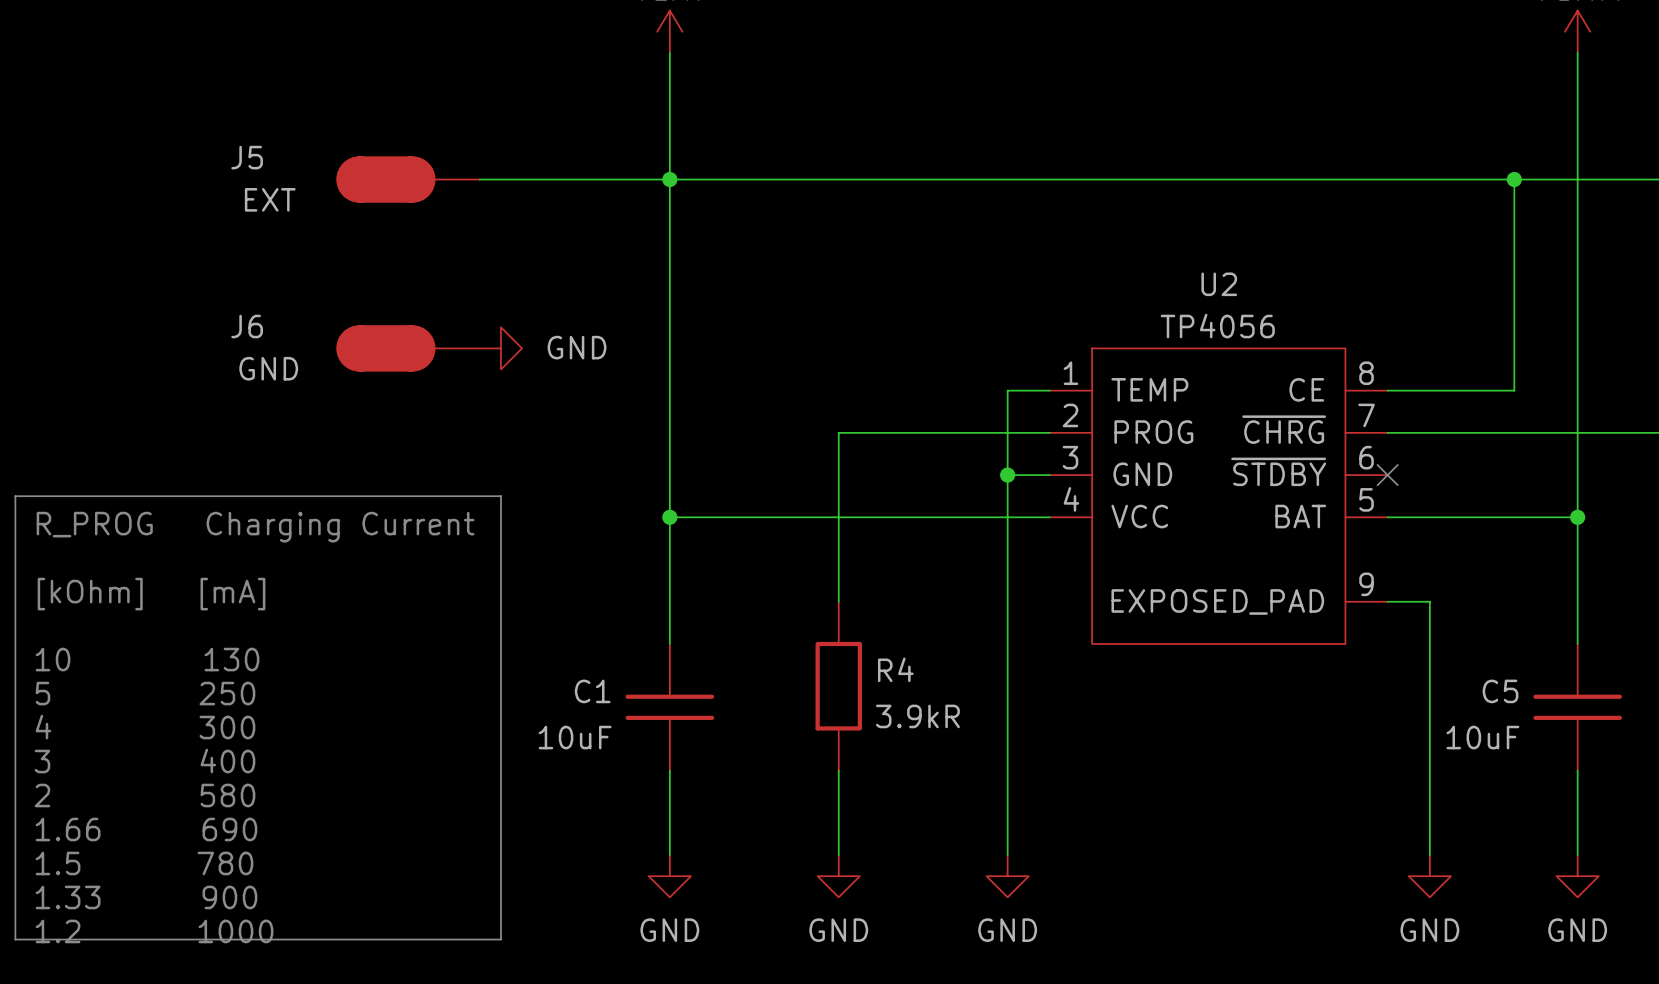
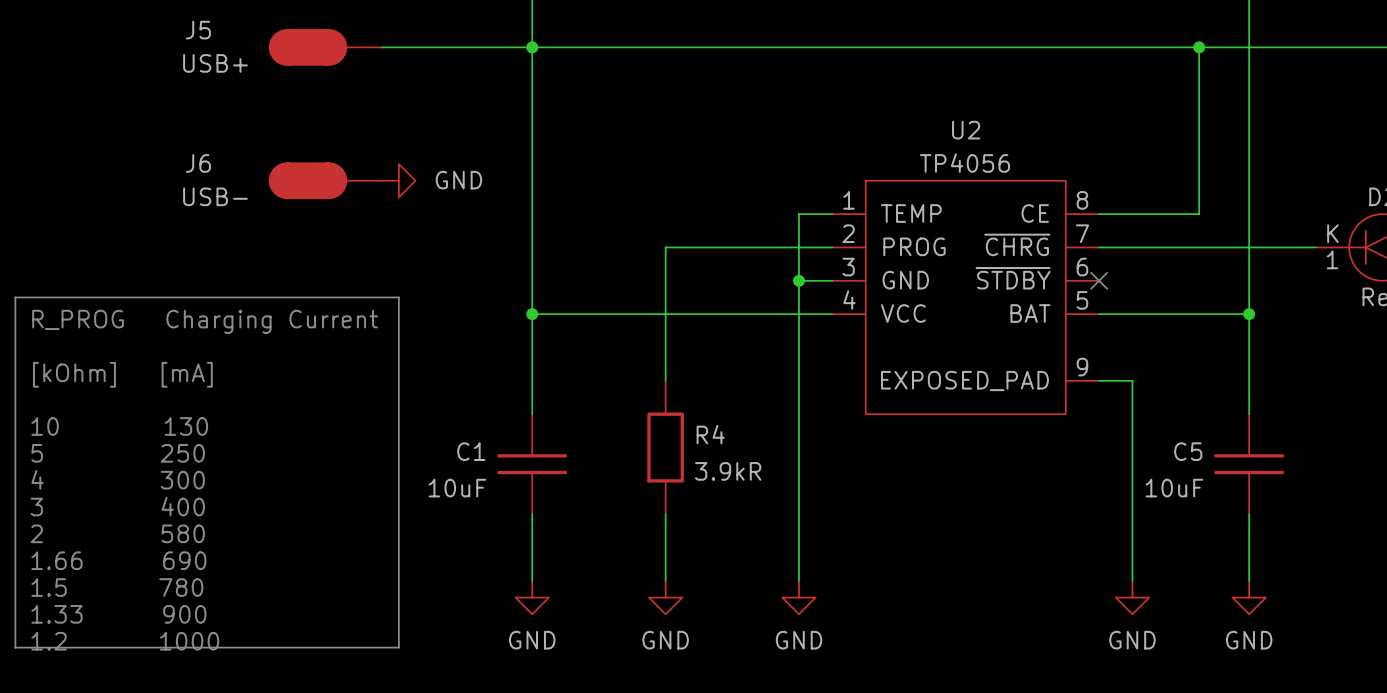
J5 value: EXT (270, 199) -> USB+ (215, 63)
J6 value: GND (268, 368) -> USB- (215, 196)

